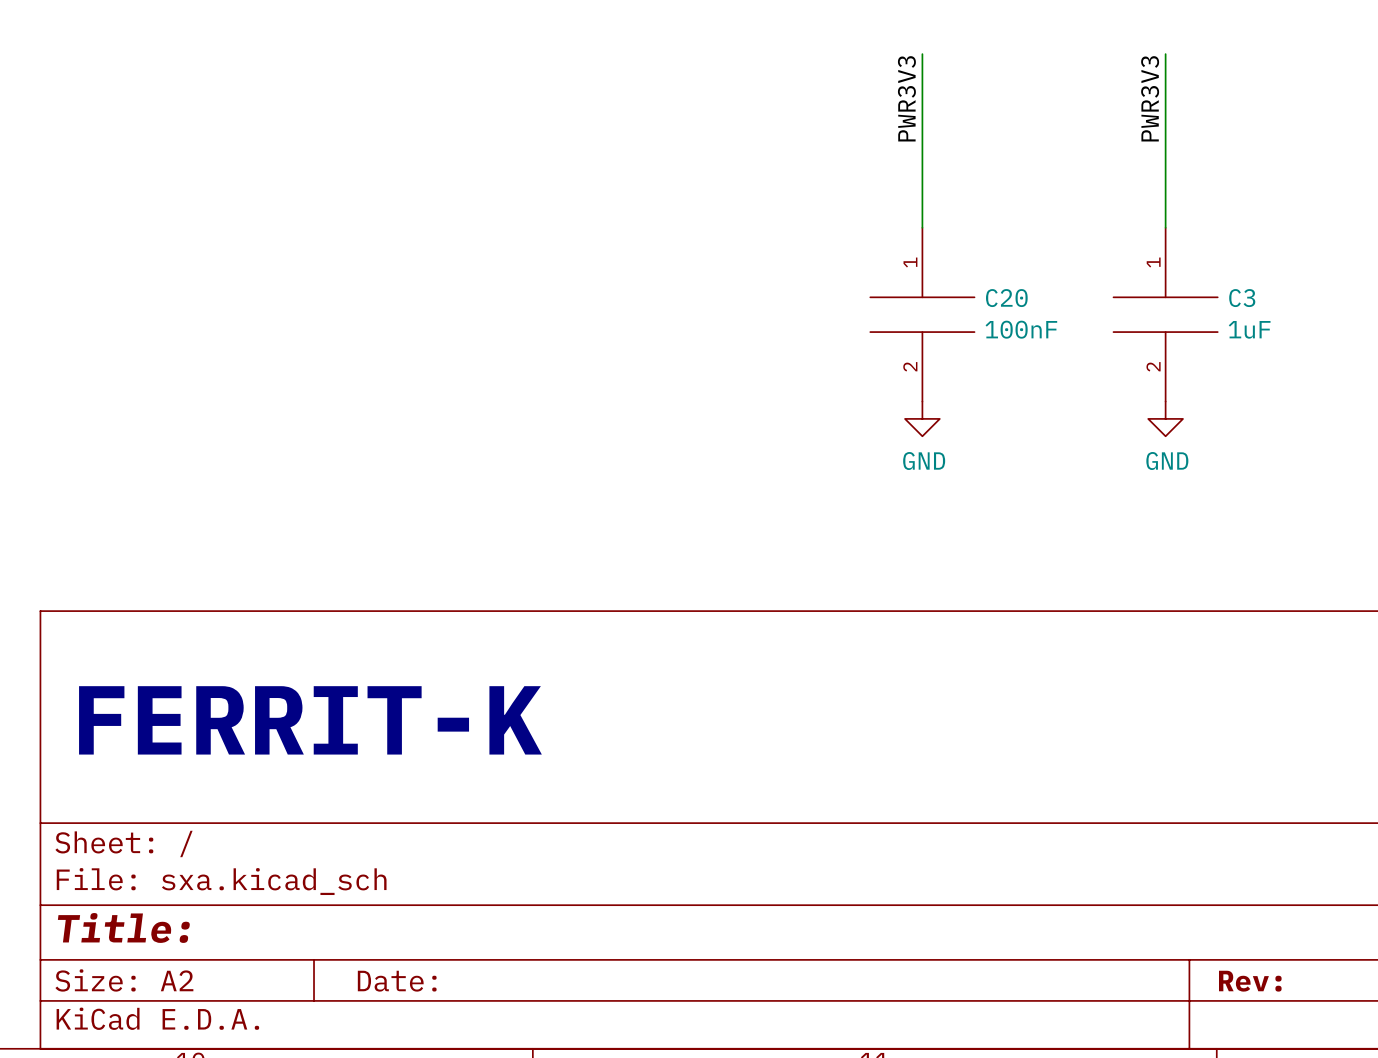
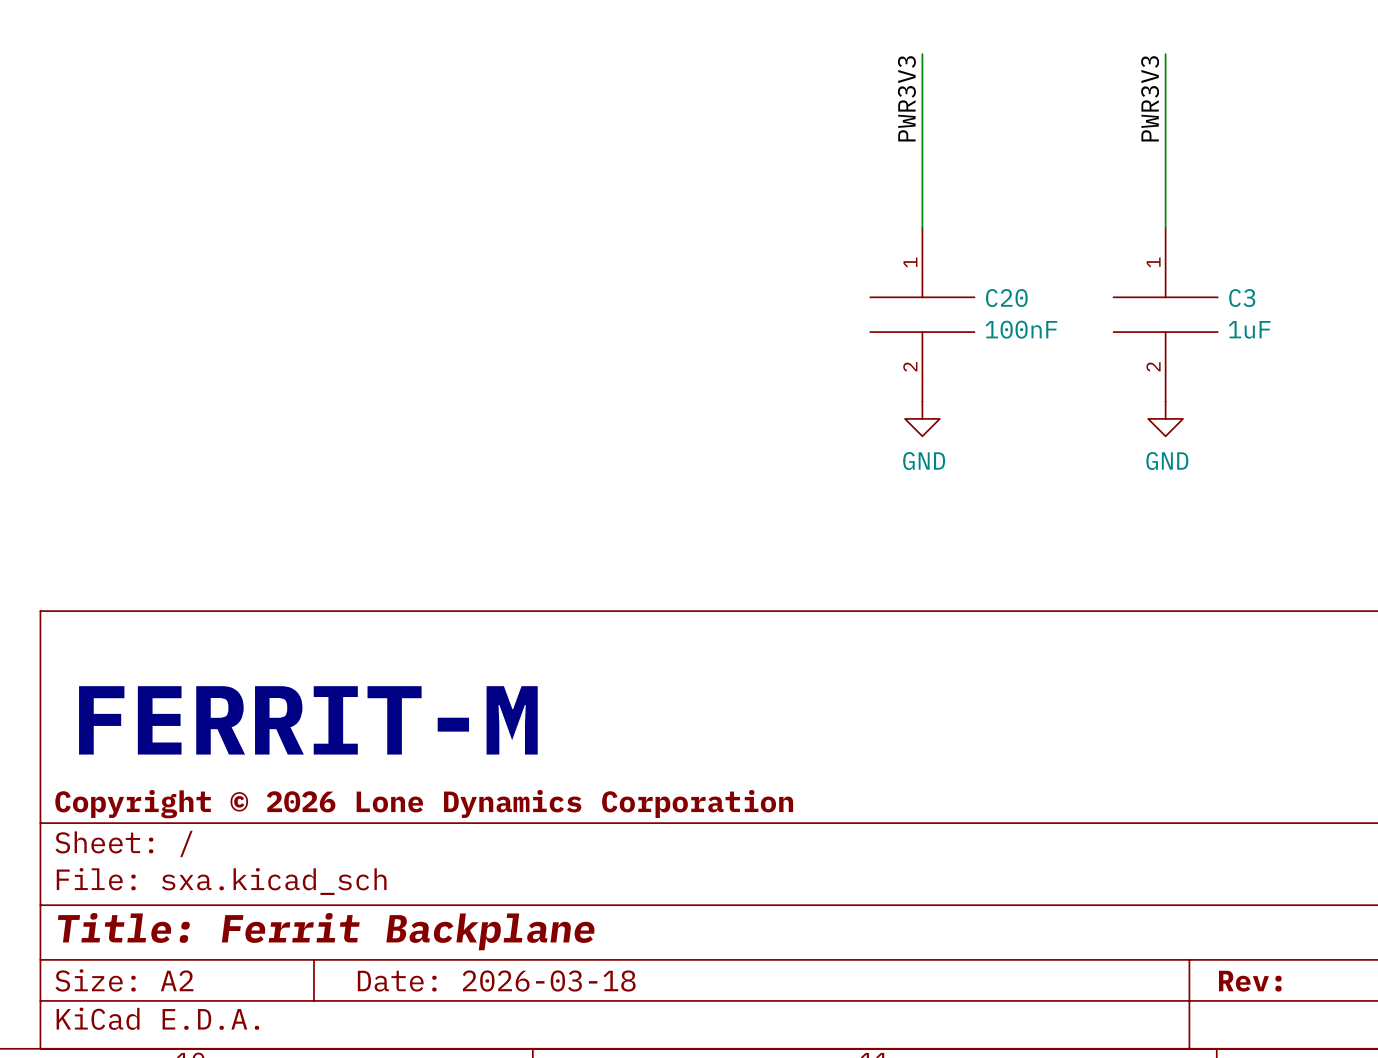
text: FERRIT-K (310, 720) -> FERRIT-M (308, 720)
title block: none -> Copyright © 2026 Lone Dynamics Corporation (424, 804)
title block: Title: (123, 927) -> Title: Ferrit Backplane (326, 931)
title block: Date: (397, 981) -> Date: 2026-03-18 (496, 981)

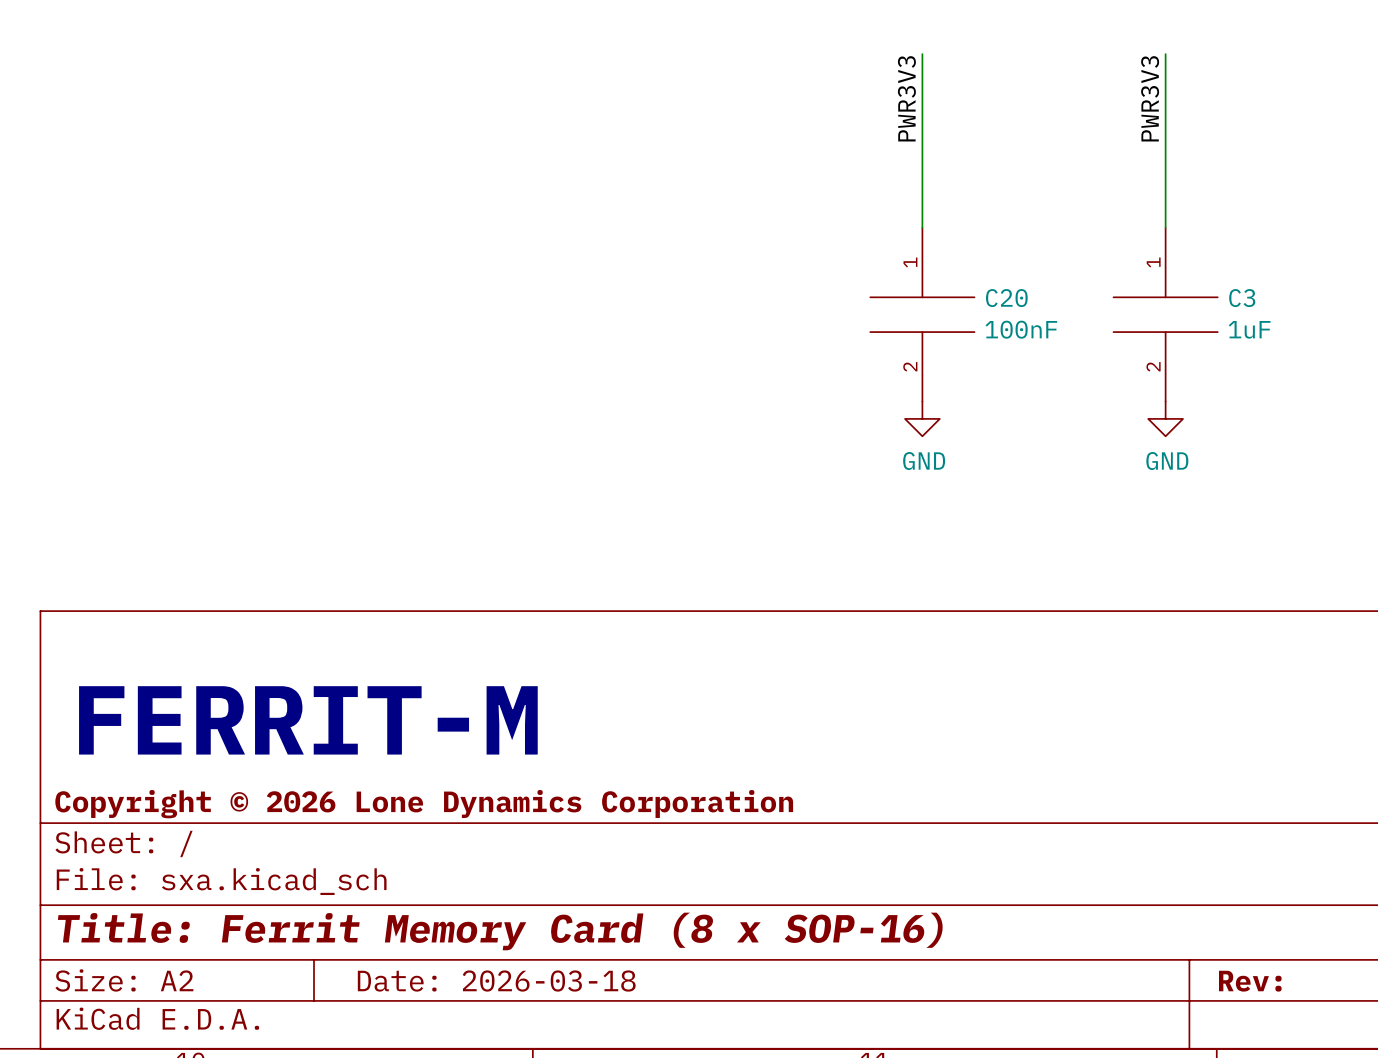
title block: Title: Ferrit Backplane (326, 931) -> Title: Ferrit Memory Card (8 x SOP-16) (500, 931)

